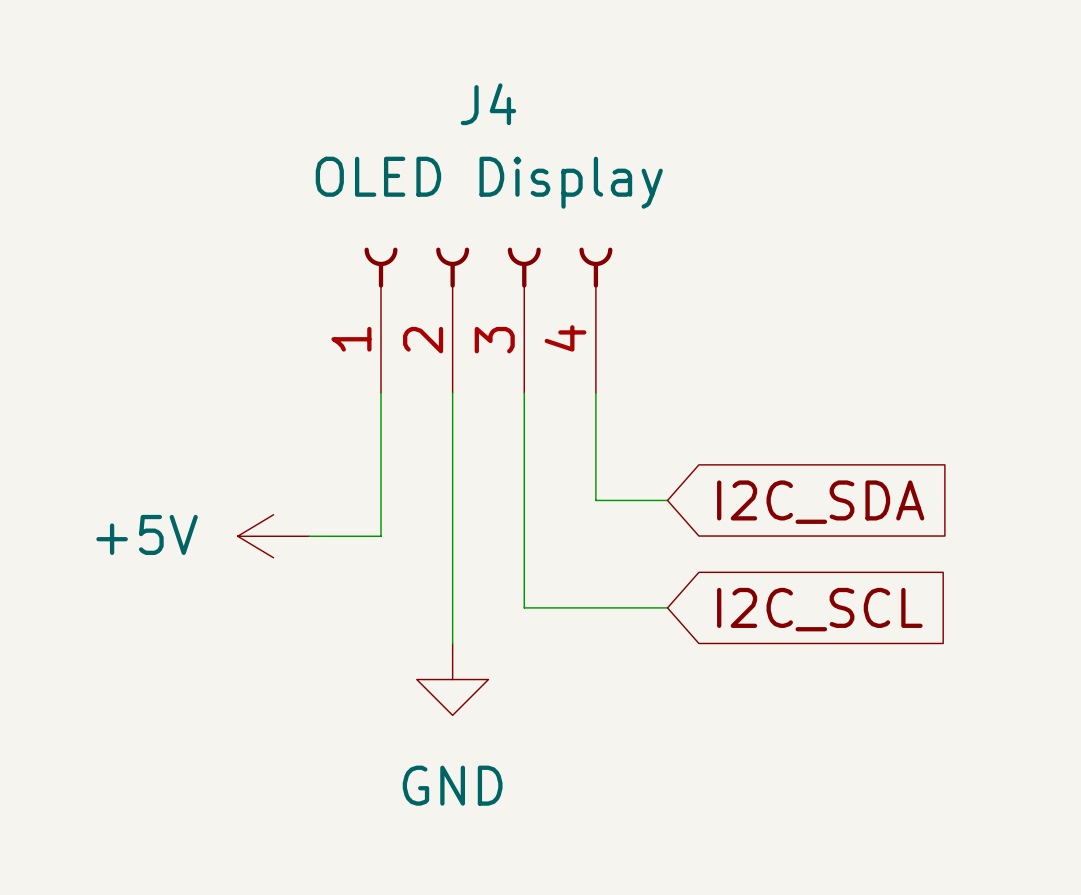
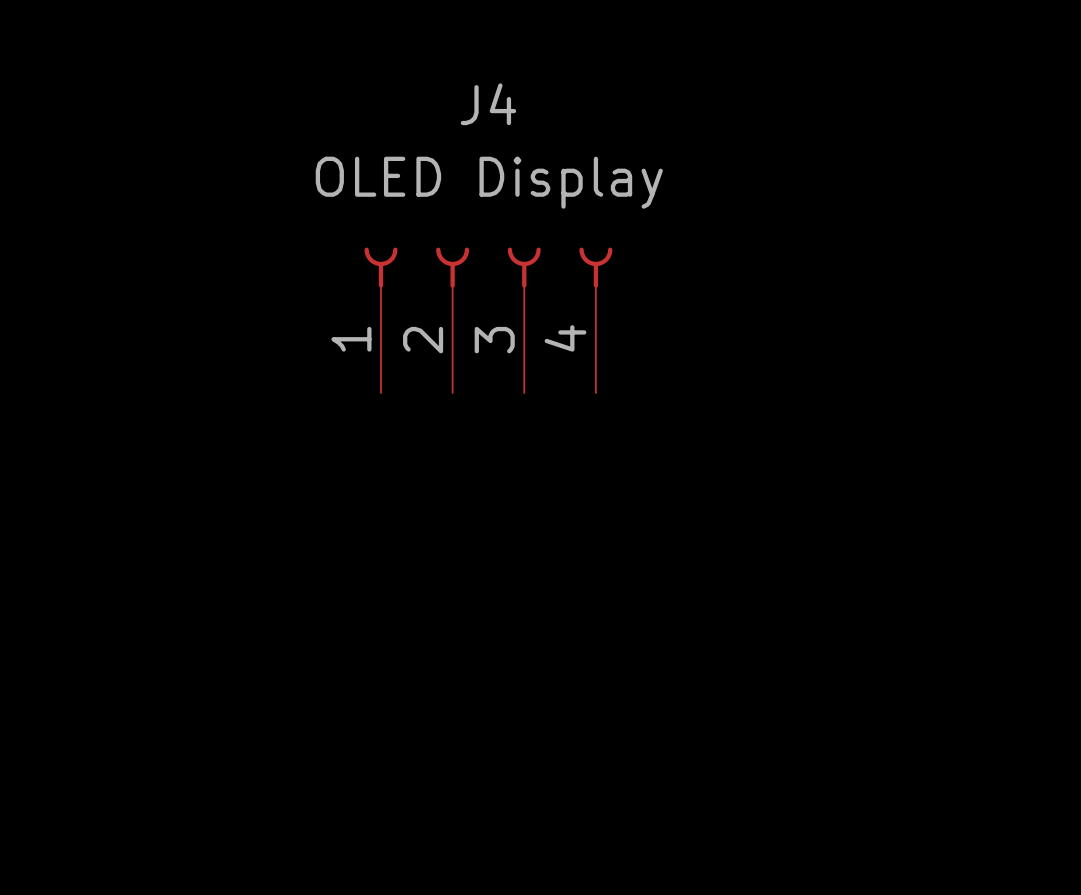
wire: (380, 392) (380, 536) (309, 536) -> none
wire: (452, 392) (452, 643) -> none
wire: (524, 392) (524, 607) (667, 607) -> none
wire: (595, 392) (595, 500) (667, 500) -> none
global label: I2C_SDA (820, 502) -> none
power symbol: +5V (273, 536) -> none
global label: I2C_SCL (819, 609) -> none
power symbol: GND (452, 679) -> none

